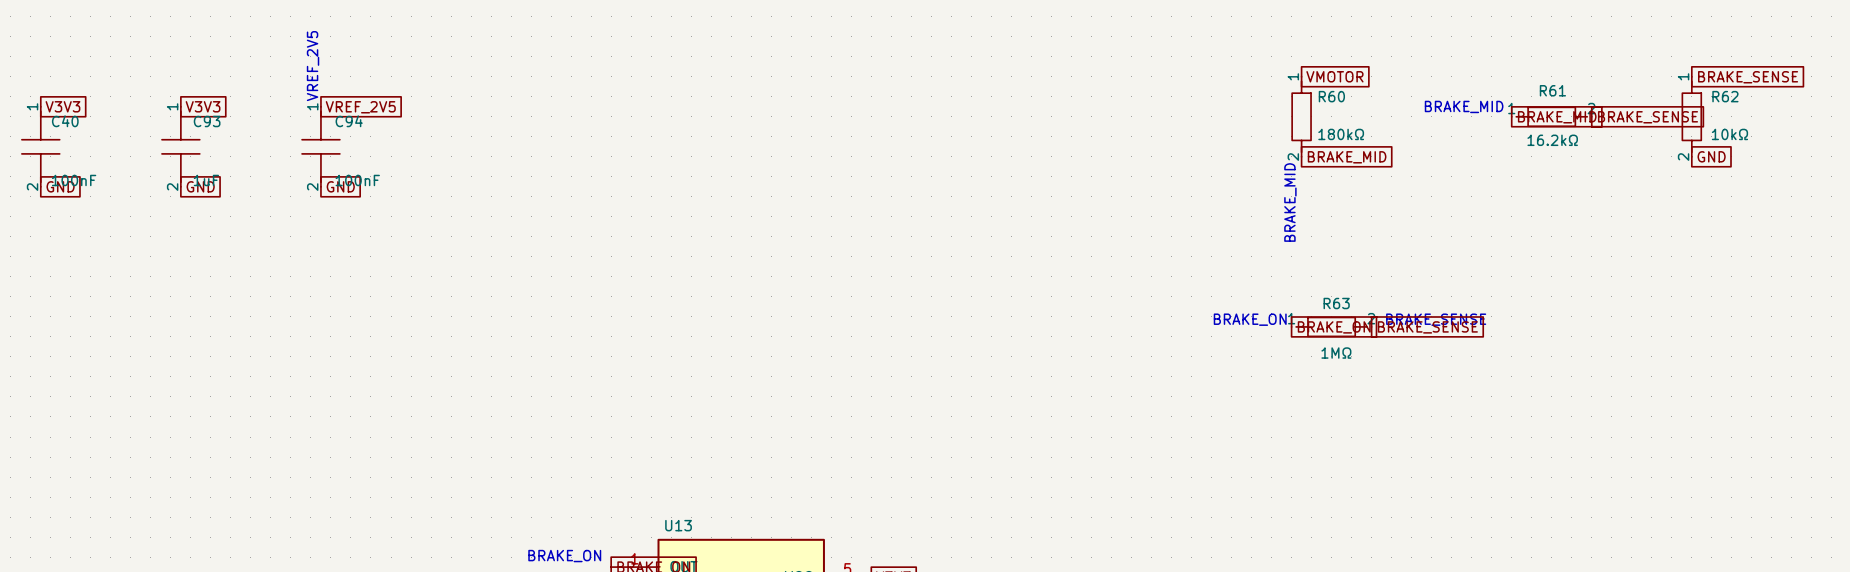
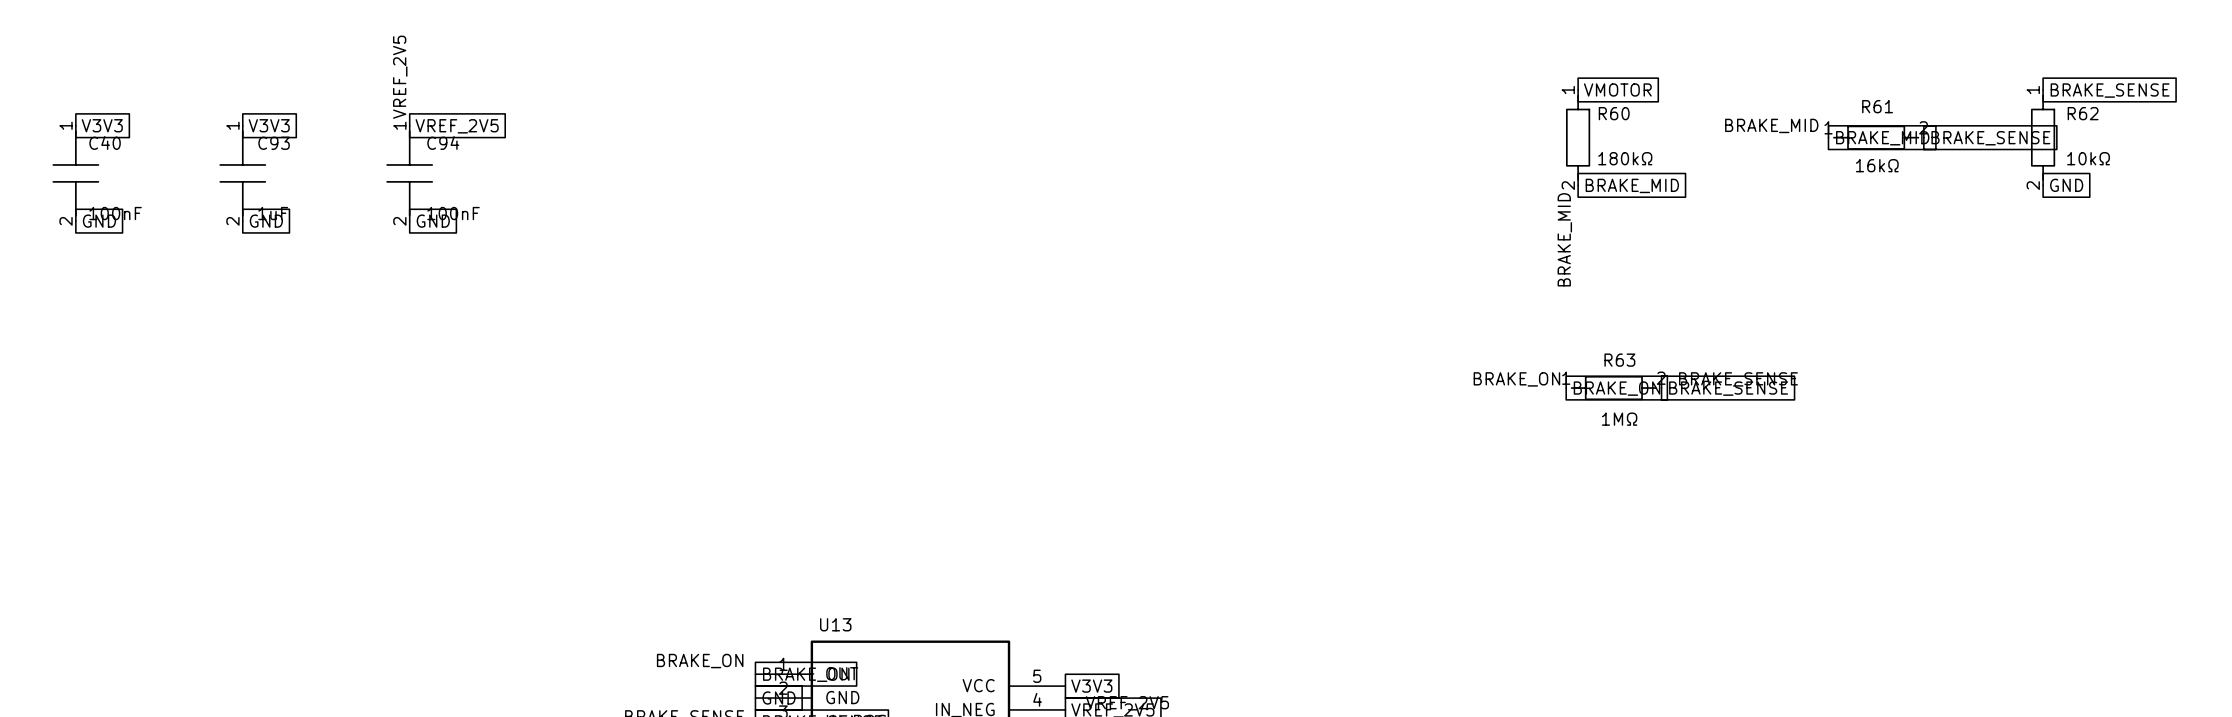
R61 value: 16.2kΩ (1552, 140) -> 16kΩ (1877, 165)

